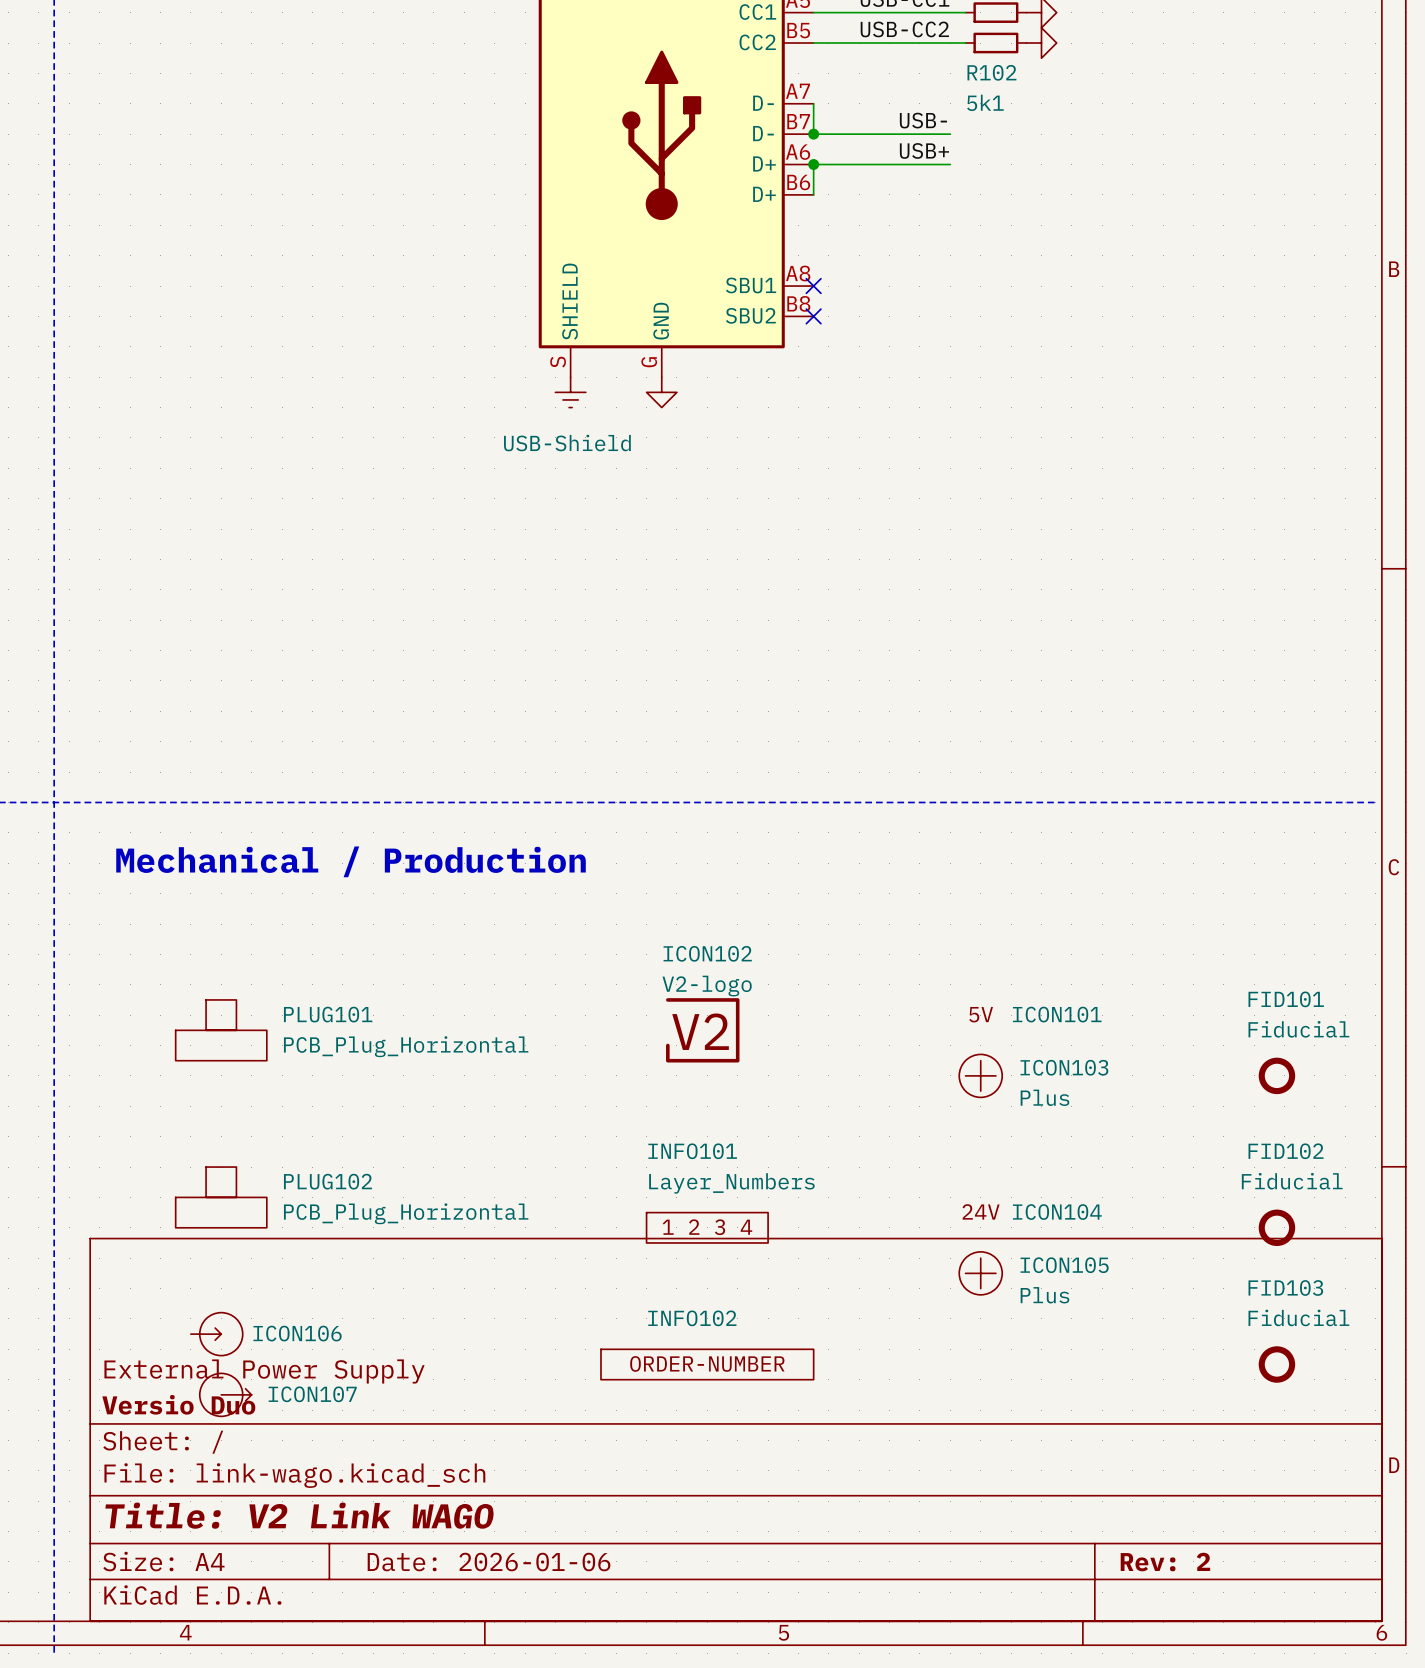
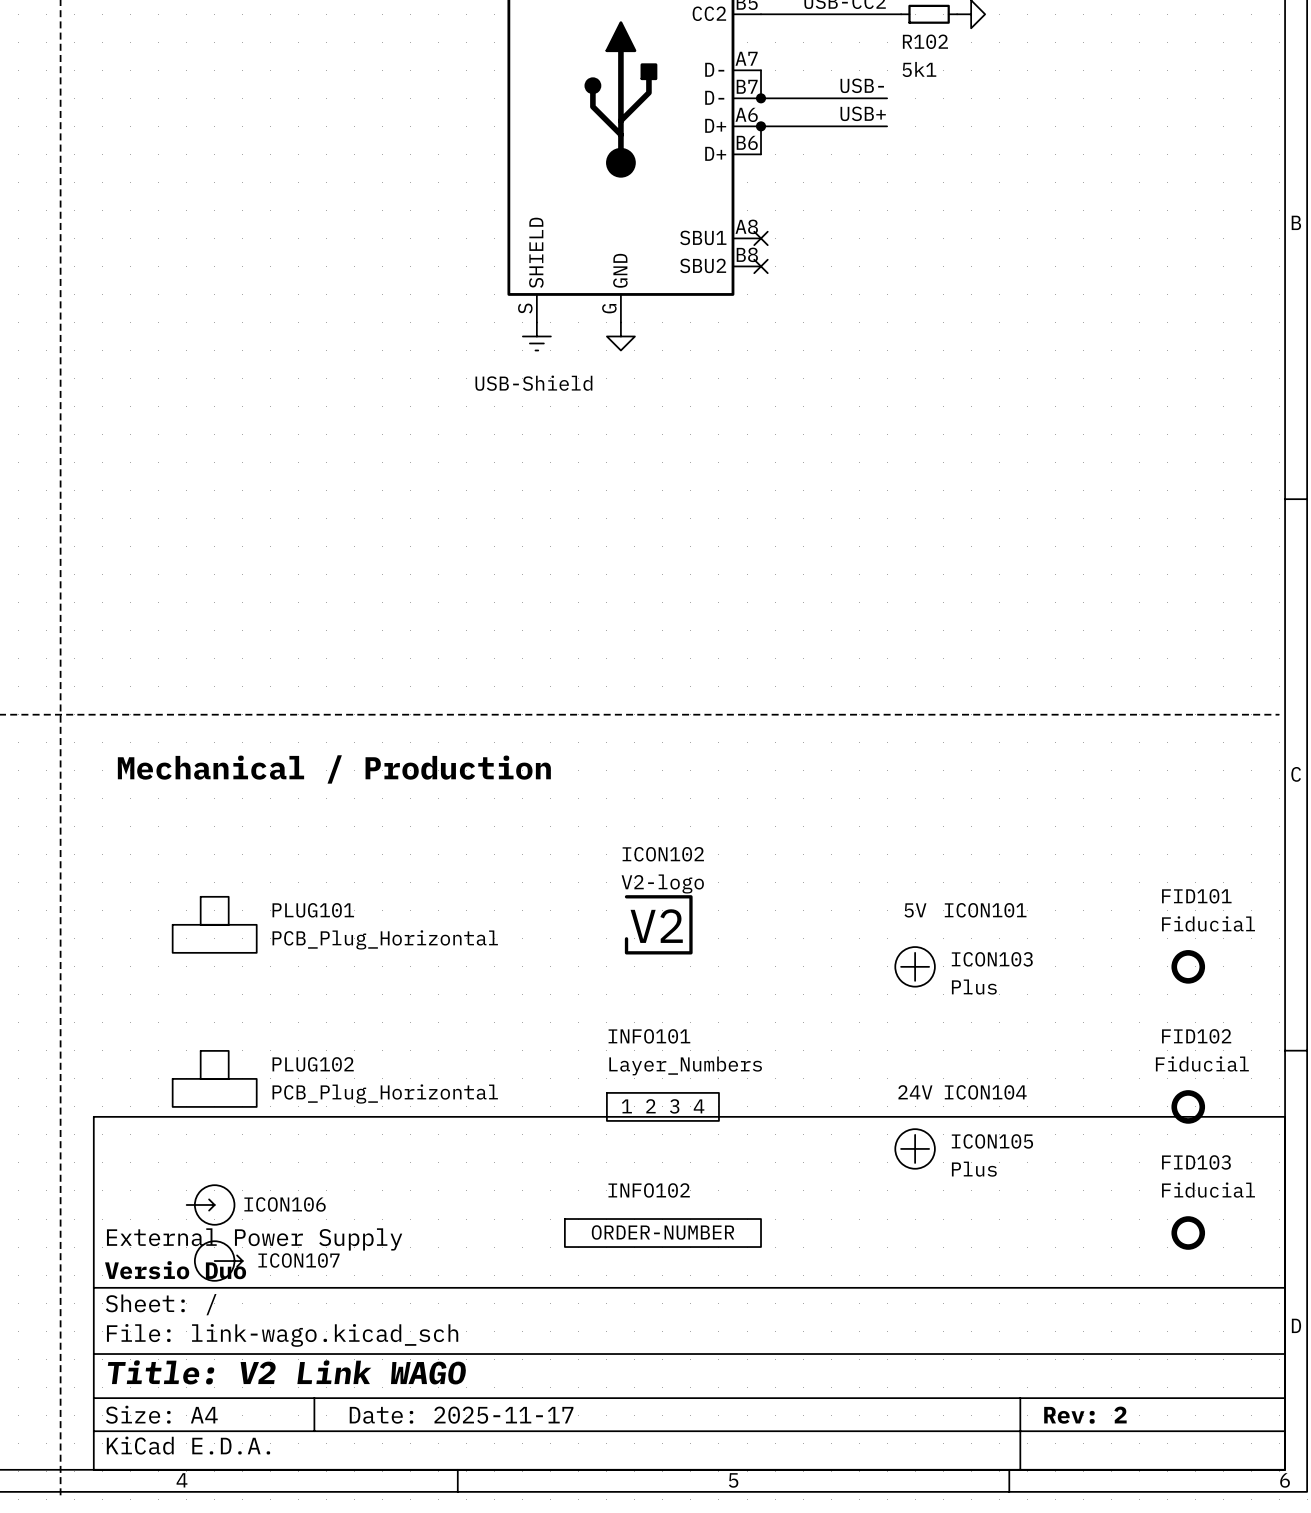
title block: Date: 2026-01-06 (489, 1562) -> Date: 2025-11-17 (461, 1415)

